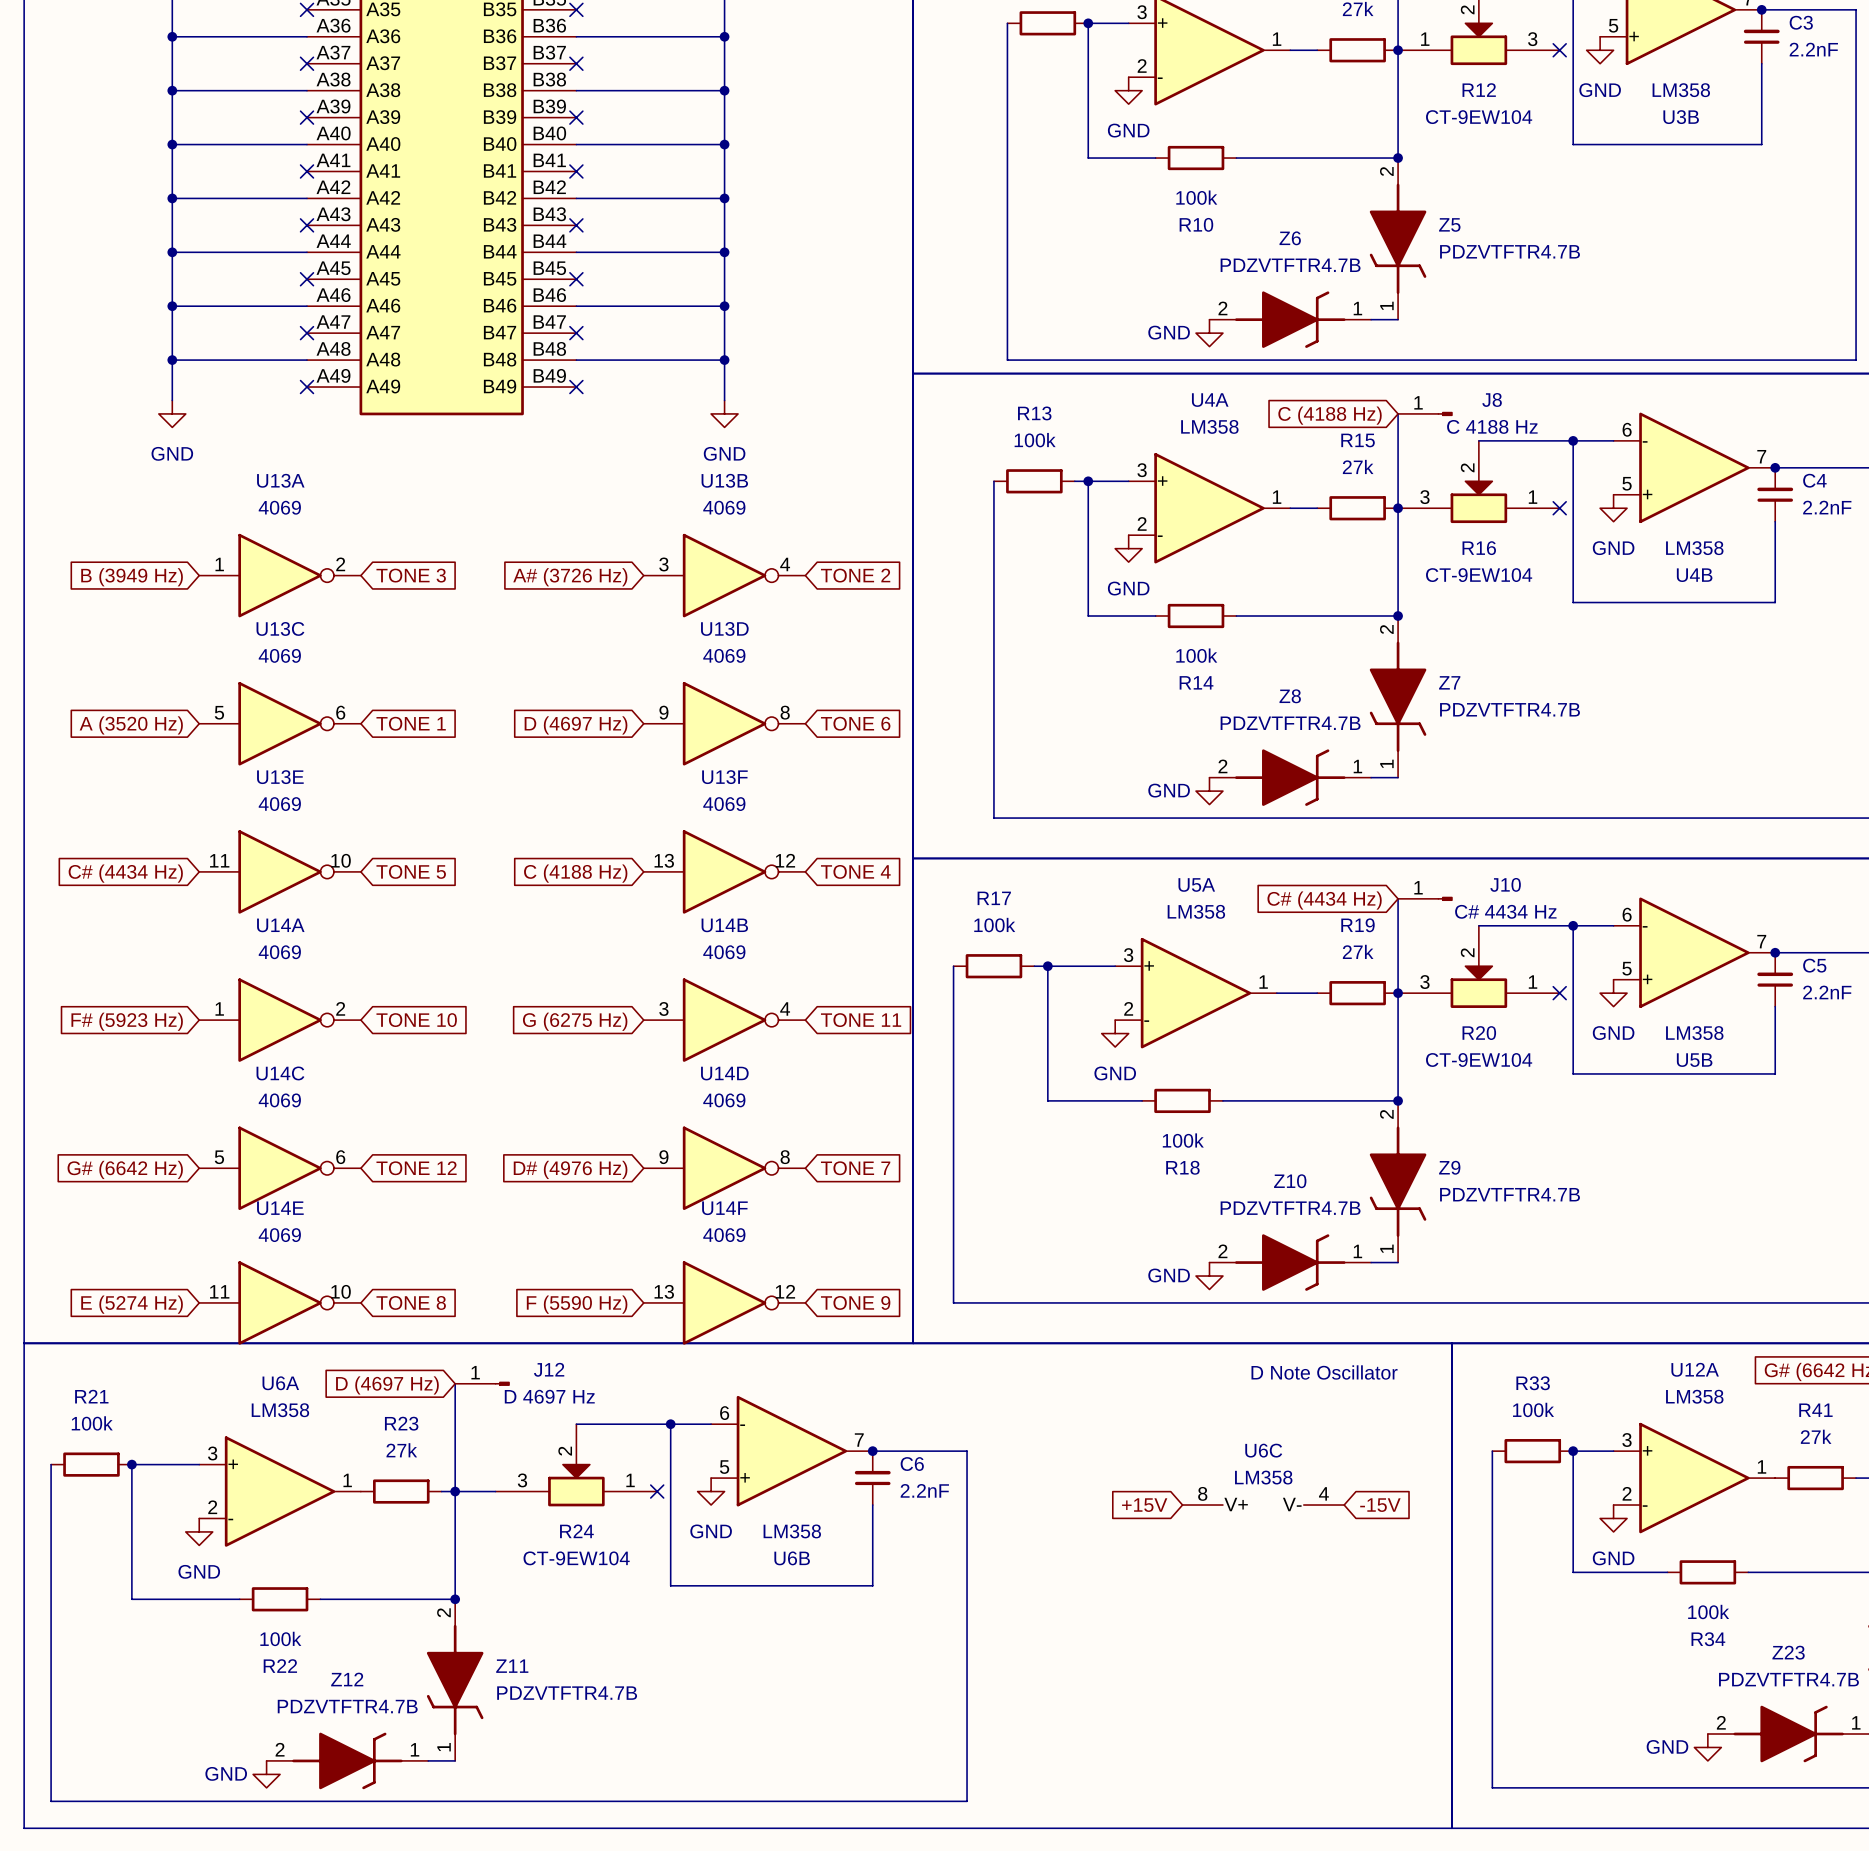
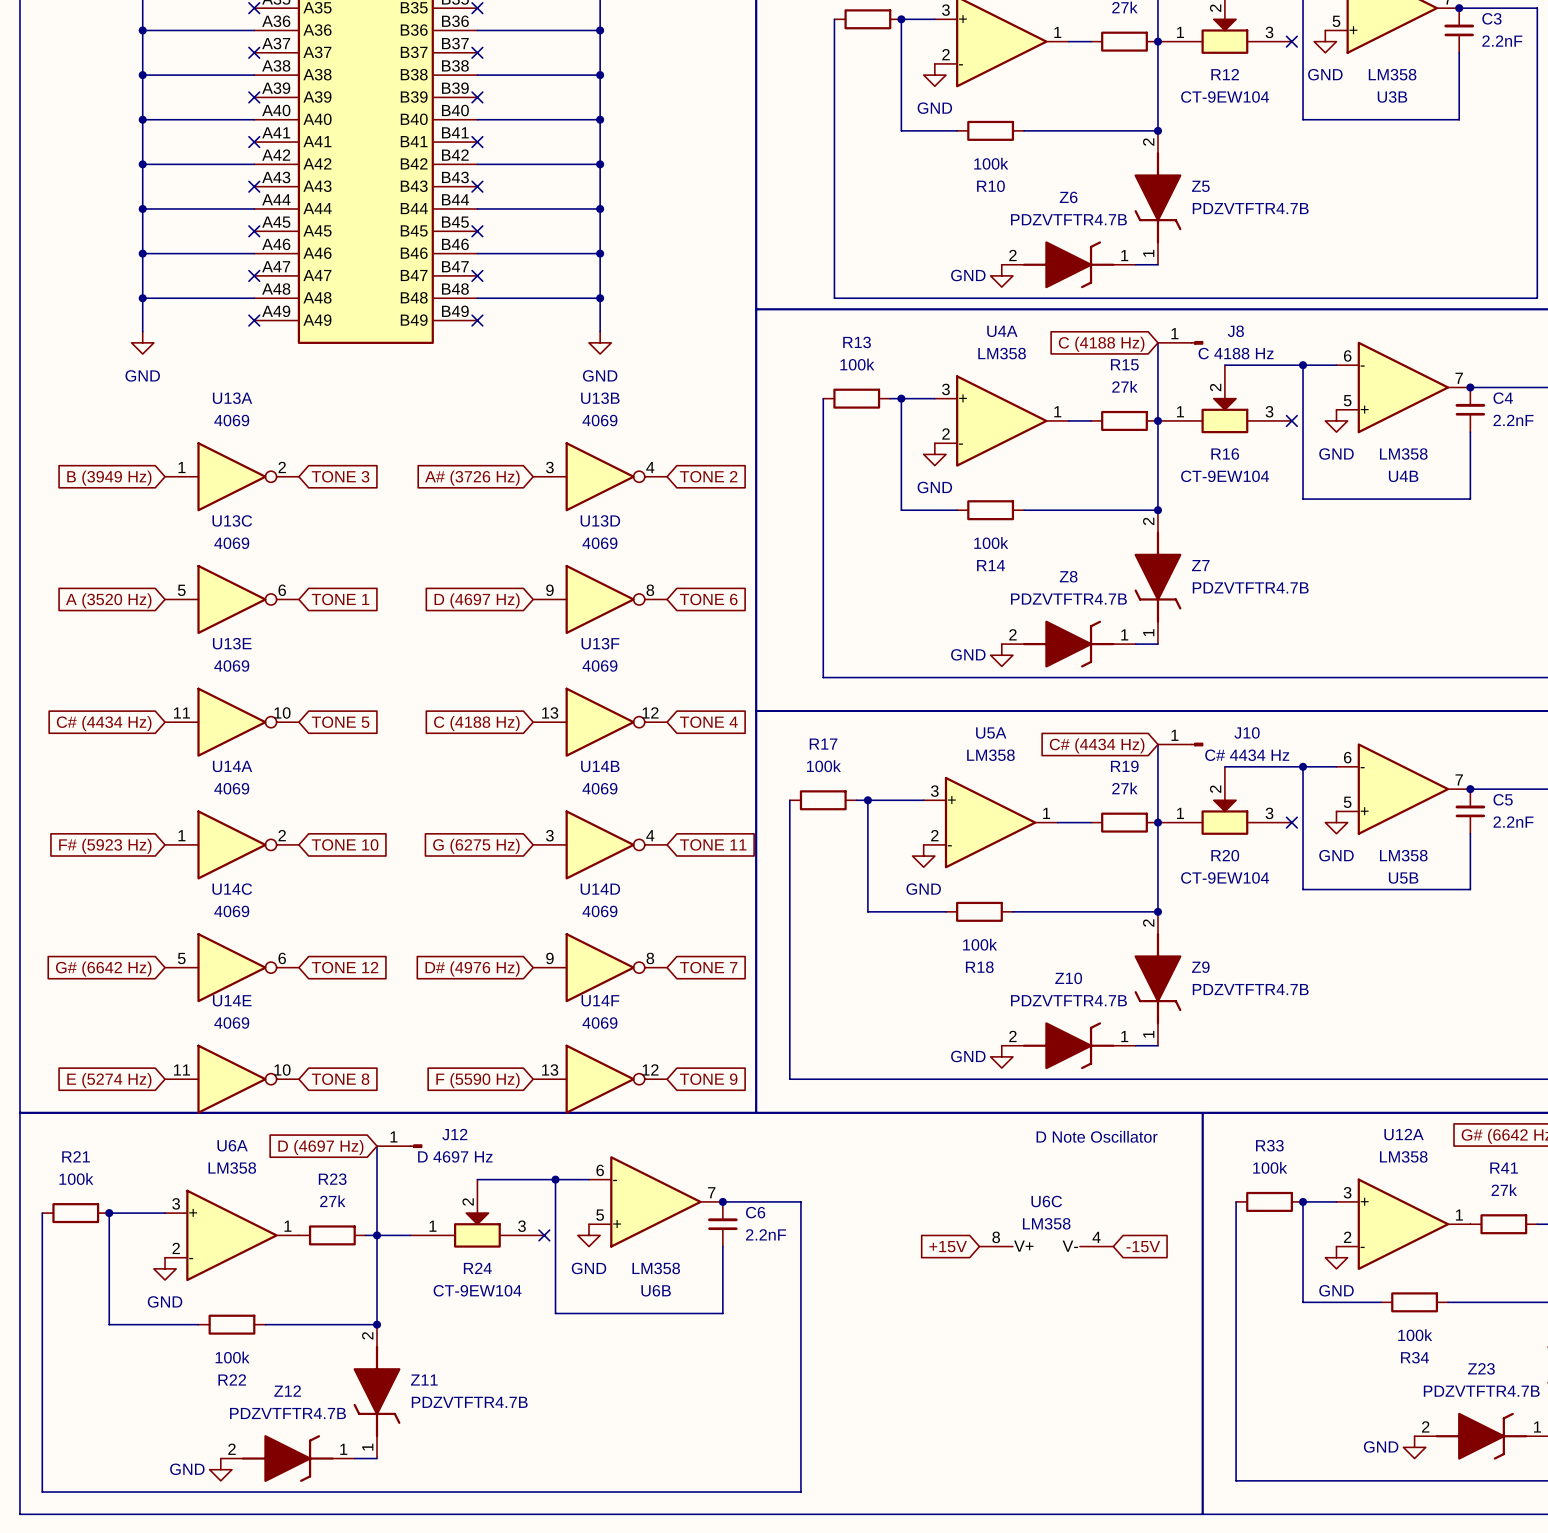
R16 flip: as is (1478, 502) -> left-right (1224, 415)
R20 flip: as is (1478, 987) -> left-right (1224, 817)
R24 flip: as is (576, 1485) -> left-right (477, 1230)

